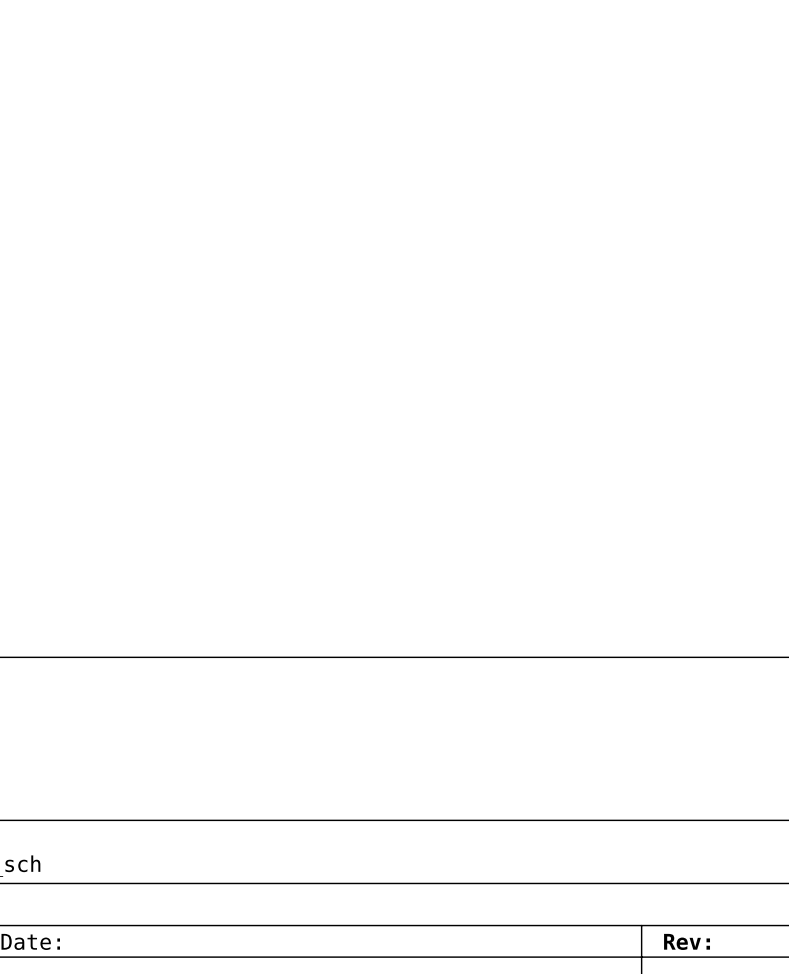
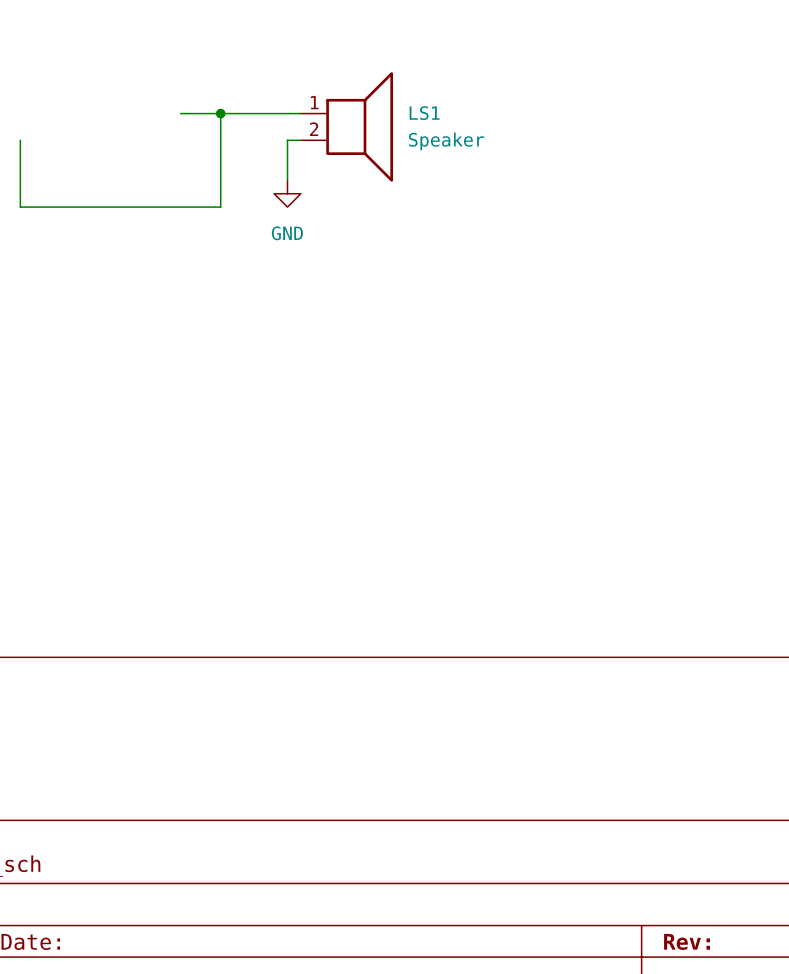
wire: none -> (180, 113) (300, 113)
wire: none -> (220, 113) (220, 207) (20, 207) (20, 140)
junction: none -> (220, 113)
LS1: none -> Speaker (346, 126)
wire: none -> (300, 140) (287, 140) (287, 180)
power symbol: none -> GND (287, 193)

